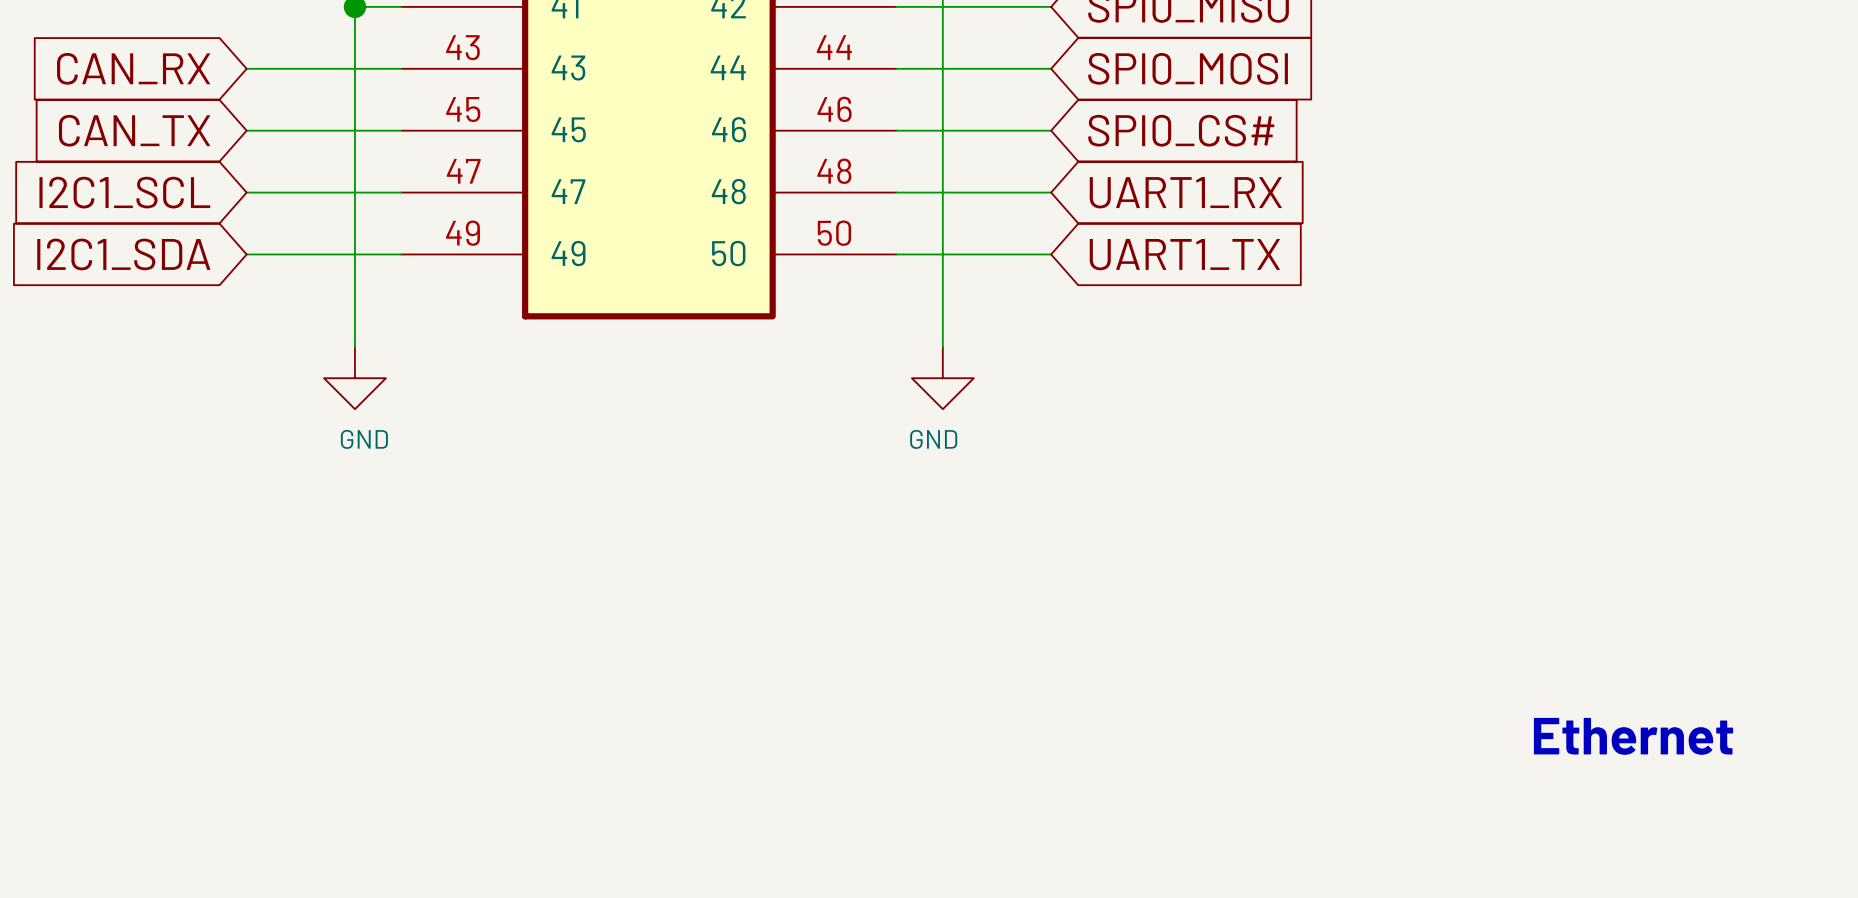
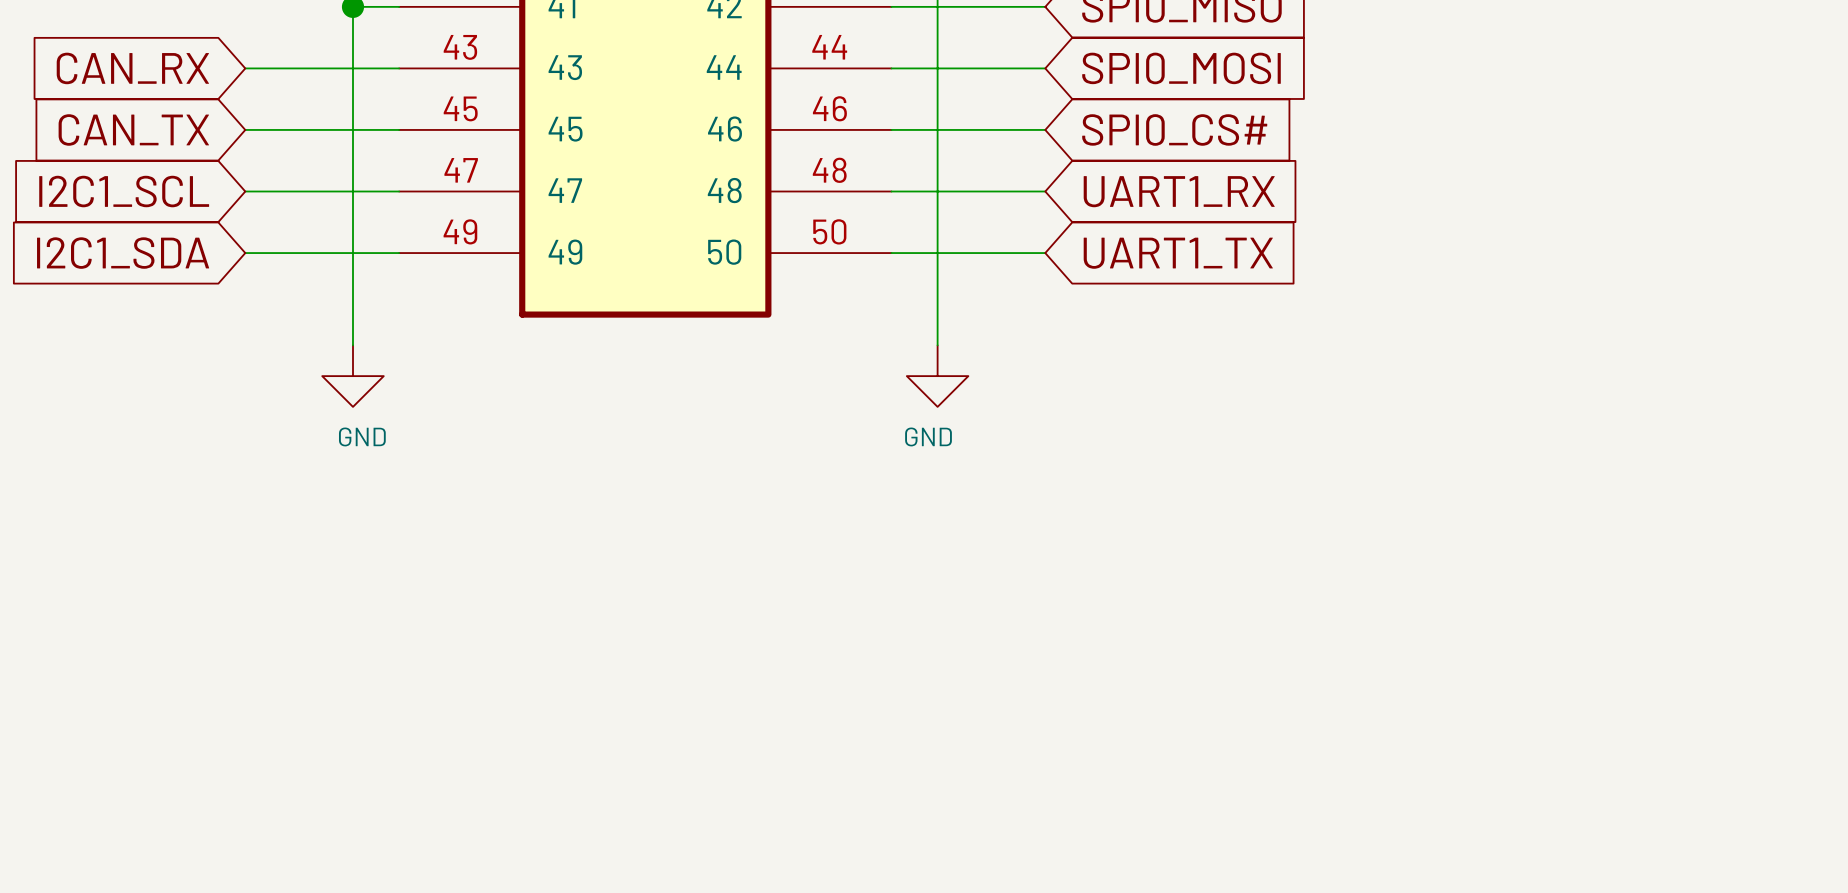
text: Ethernet (1633, 736) -> none

